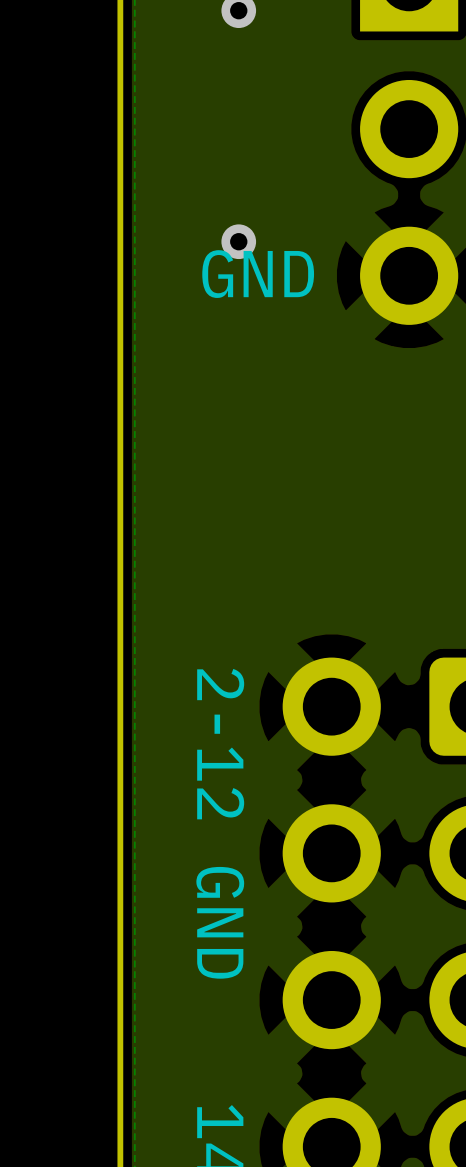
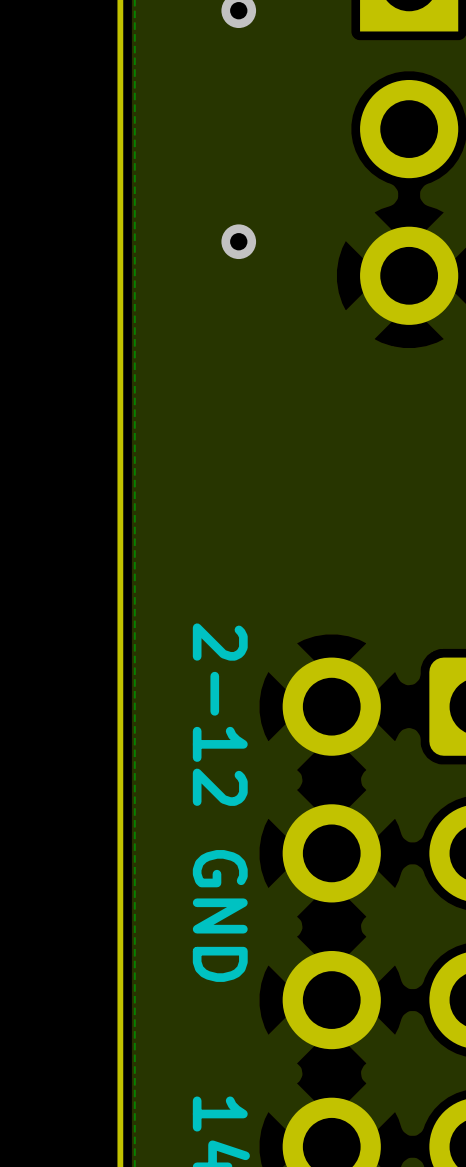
text: GND (258, 274) -> none

